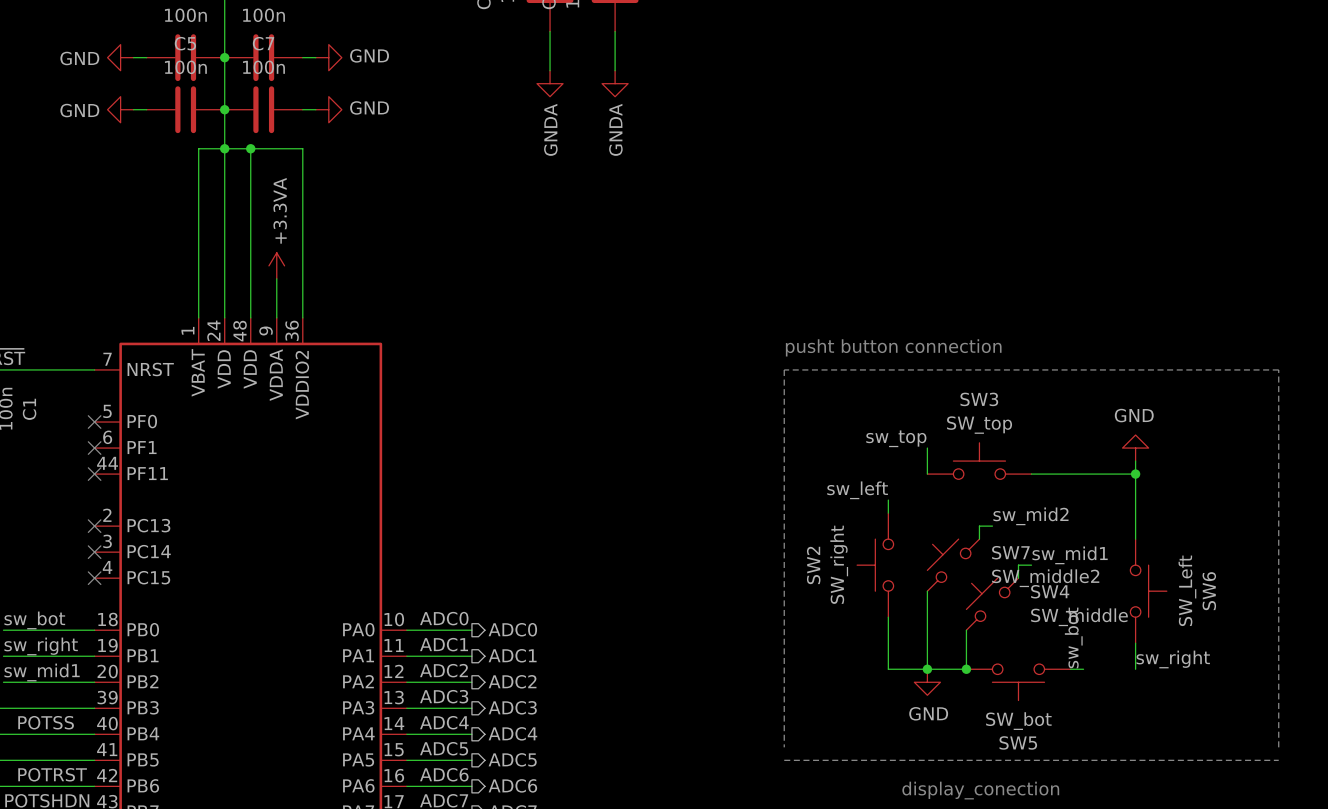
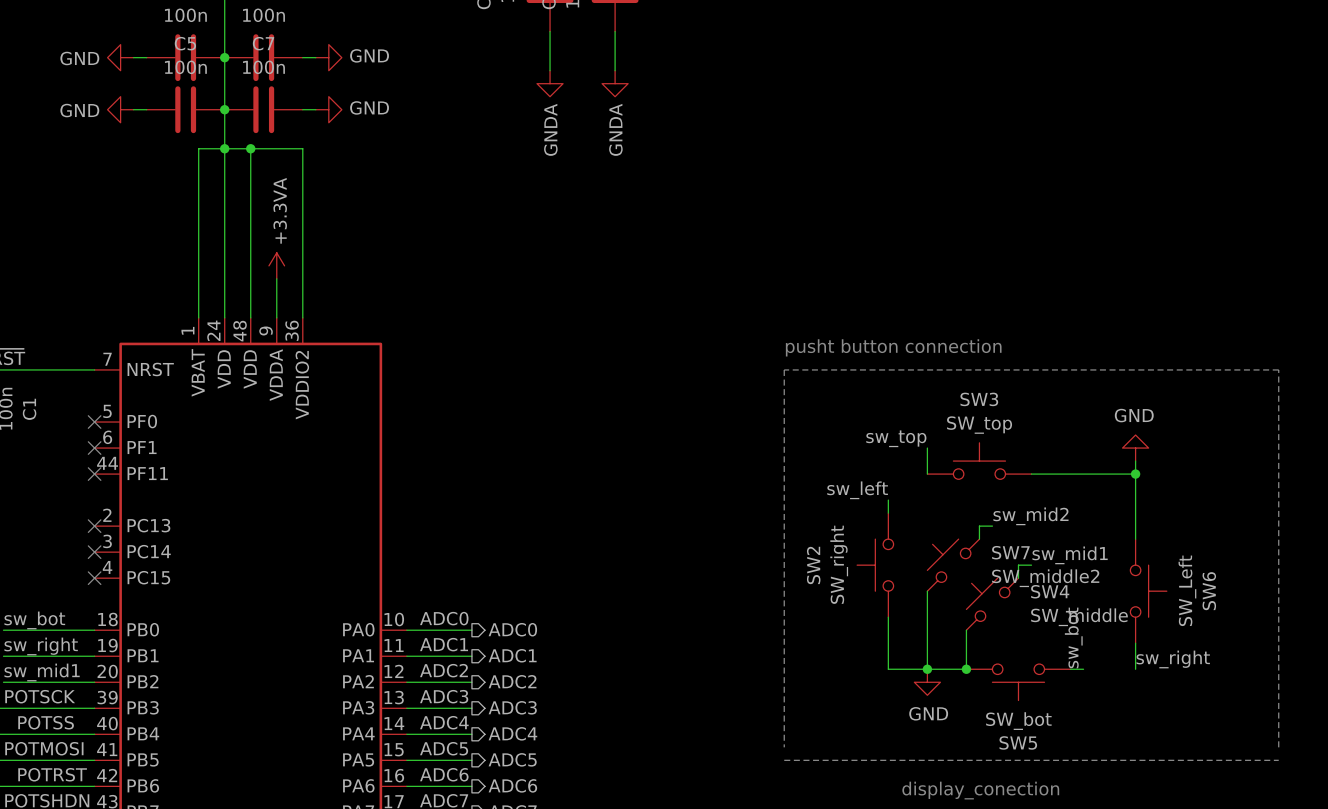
label: none -> POTSCK (40, 696)
label: none -> POTMOSI (44, 748)

